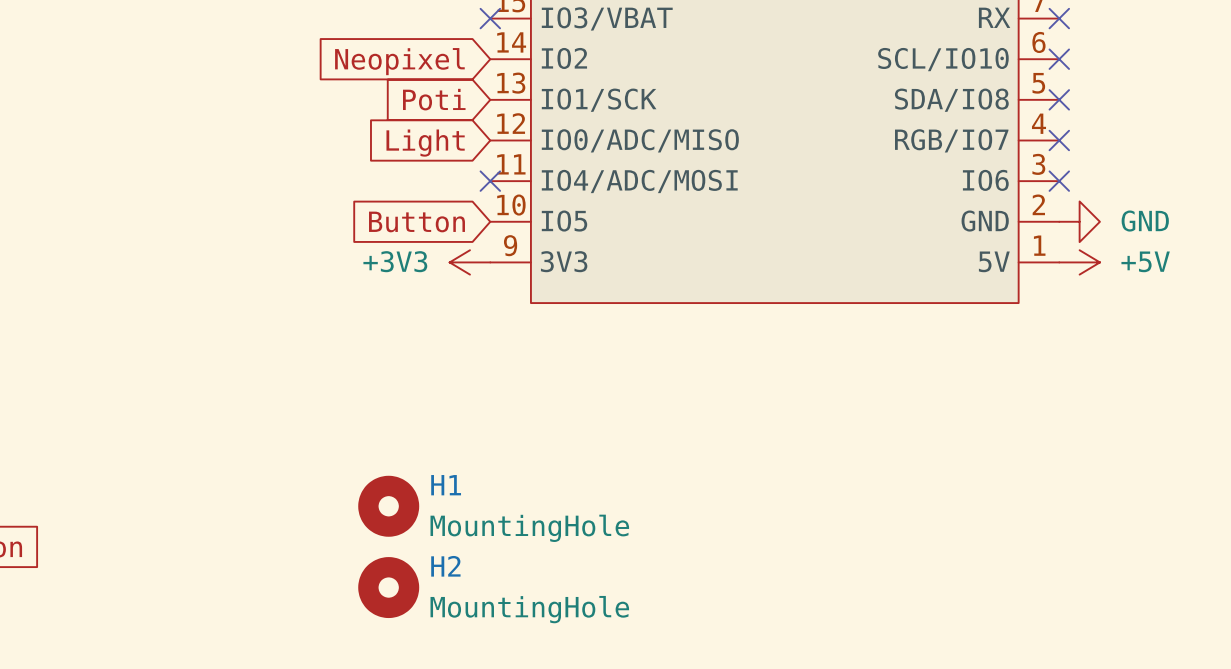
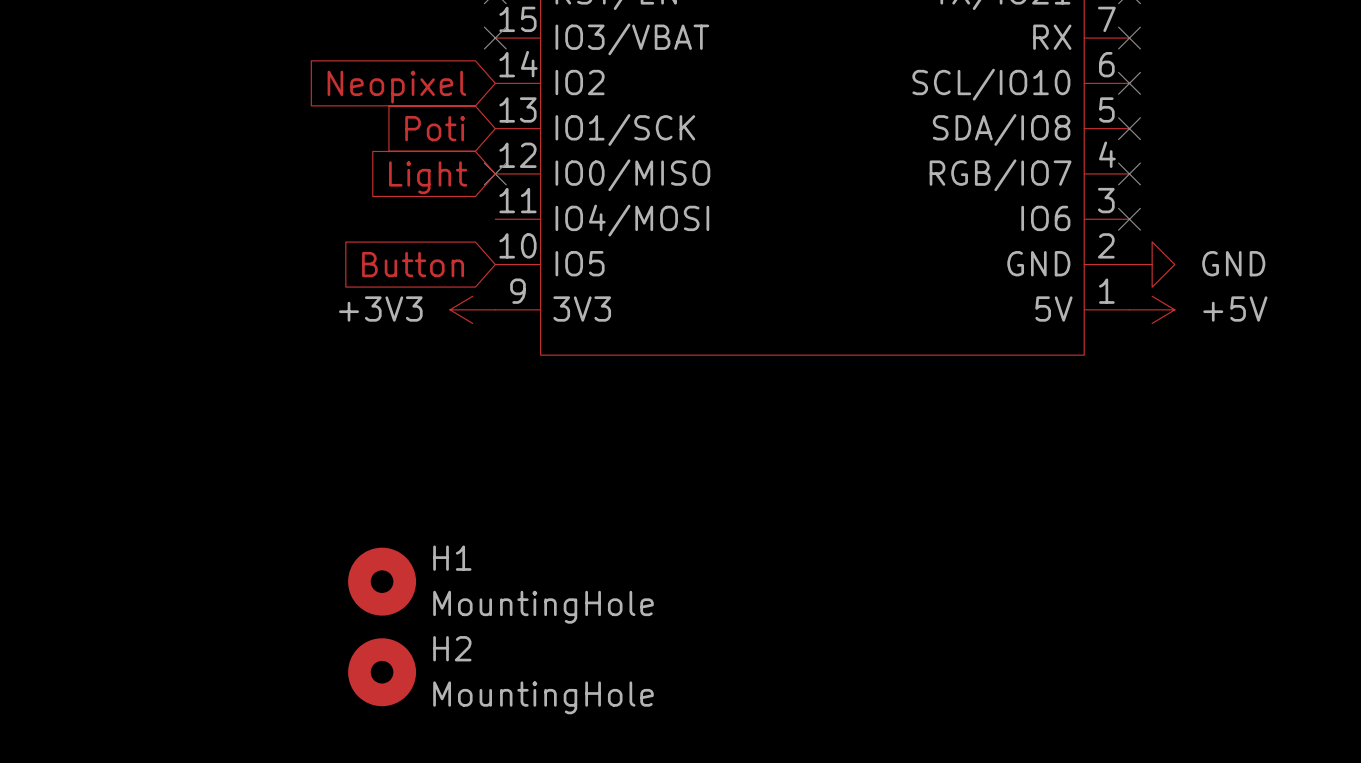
part pin name: IO0/ADC/MISO (640, 140) -> IO0/MISO (632, 175)
no-connect mark position: (490, 181) -> (495, 173)
part pin name: IO4/ADC/MOSI (639, 181) -> IO4/MOSI (632, 220)

